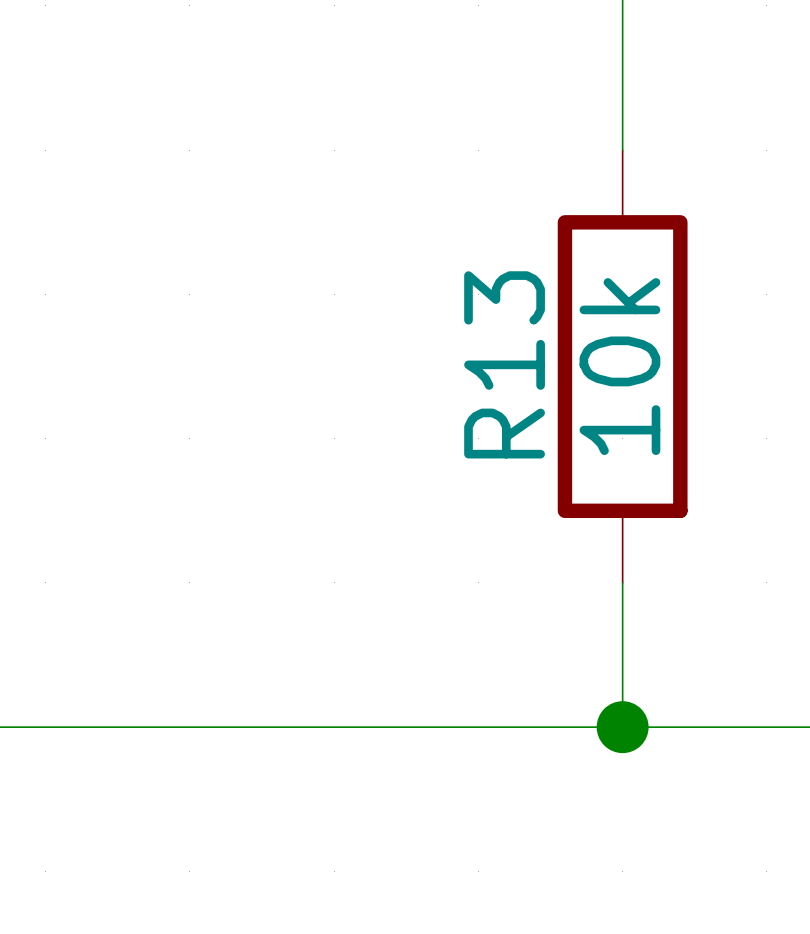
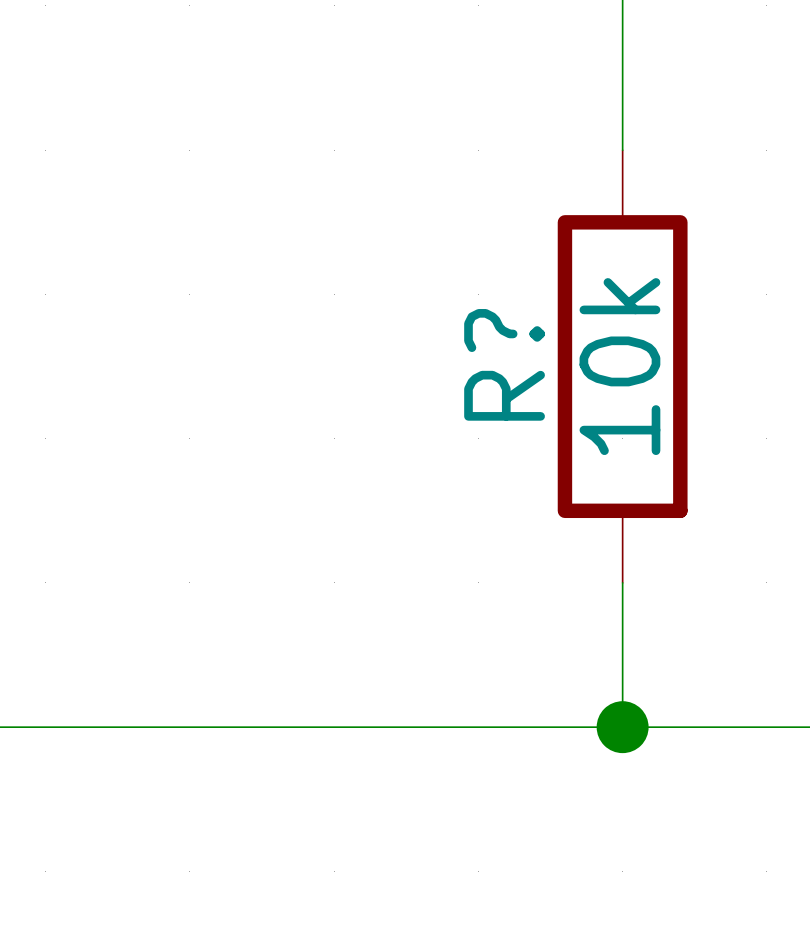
R13 name: R13 (504, 364) -> R? (504, 364)

